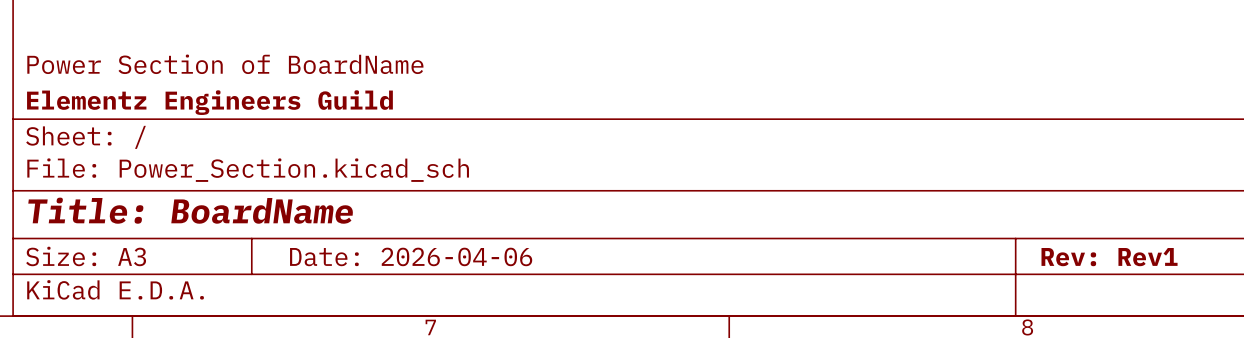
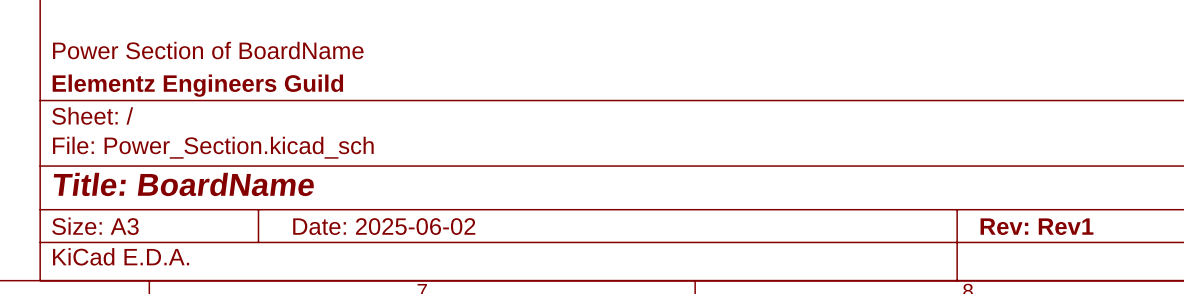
title block: Date: 2026-04-06 (411, 256) -> Date: 2025-06-02 (384, 226)

